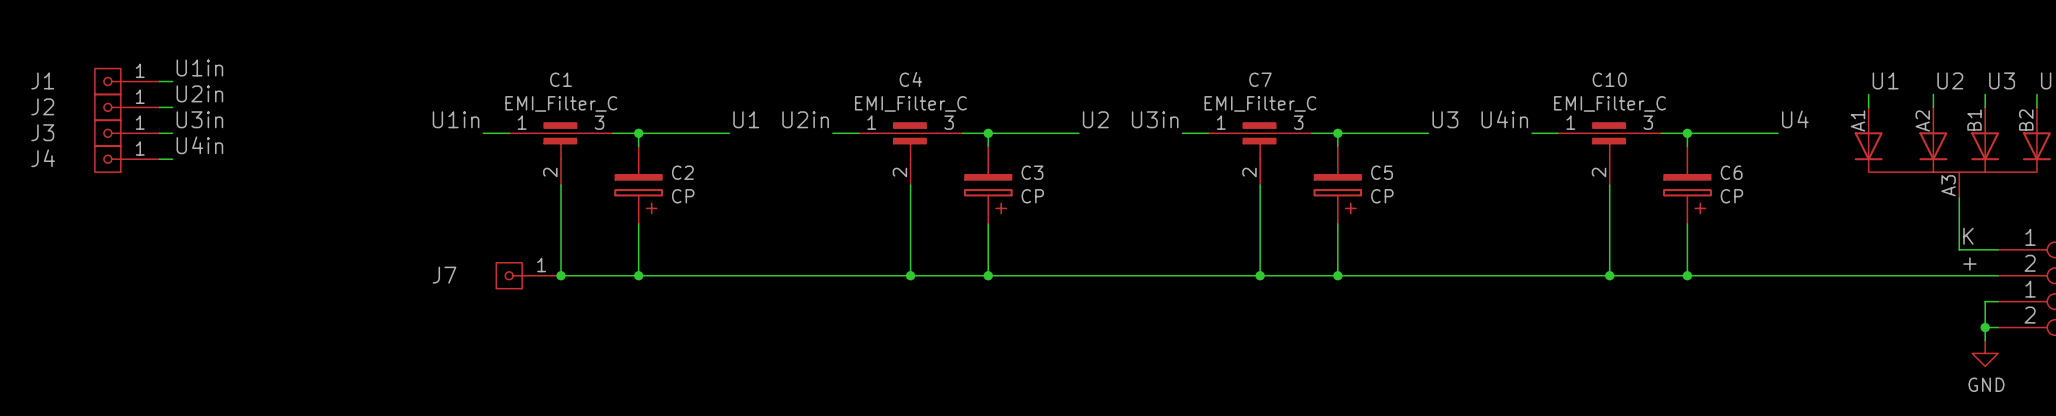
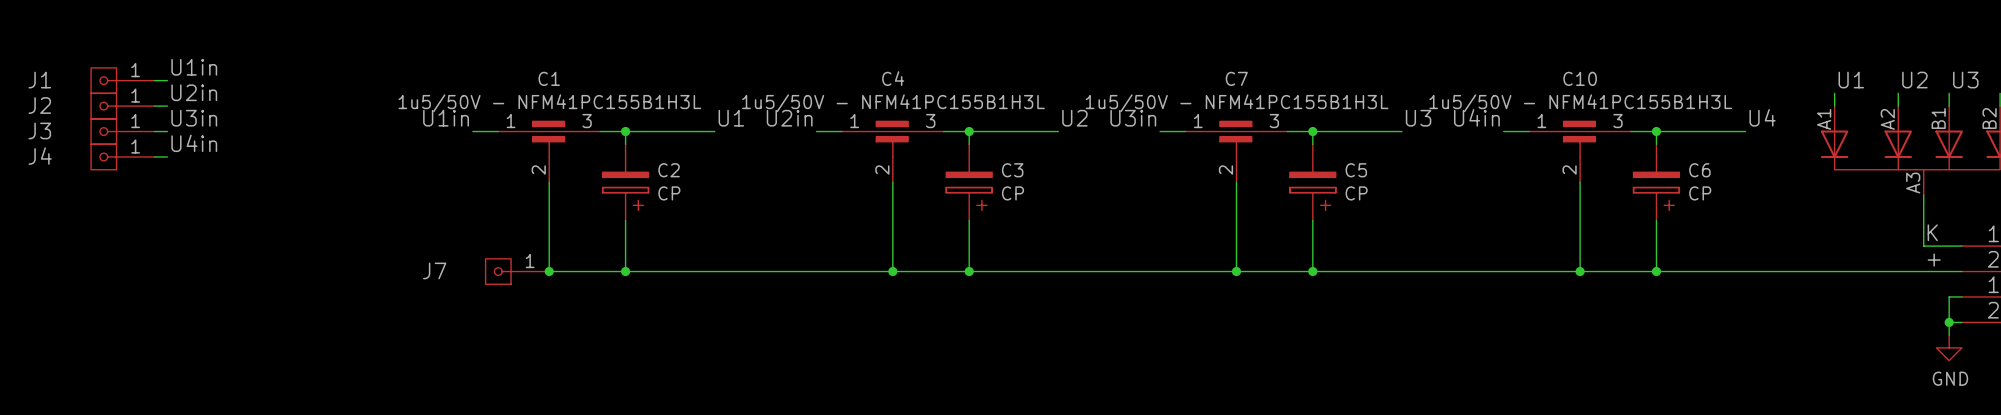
C1 value: EMI_Filter_C (561, 103) -> 1u5/50V - NFM41PC155B1H3L (549, 103)
C4 value: EMI_Filter_C (910, 103) -> 1u5/50V - NFM41PC155B1H3L (893, 103)
C7 value: EMI_Filter_C (1260, 103) -> 1u5/50V - NFM41PC155B1H3L (1237, 103)
C10 value: EMI_Filter_C (1610, 103) -> 1u5/50V - NFM41PC155B1H3L (1580, 103)

